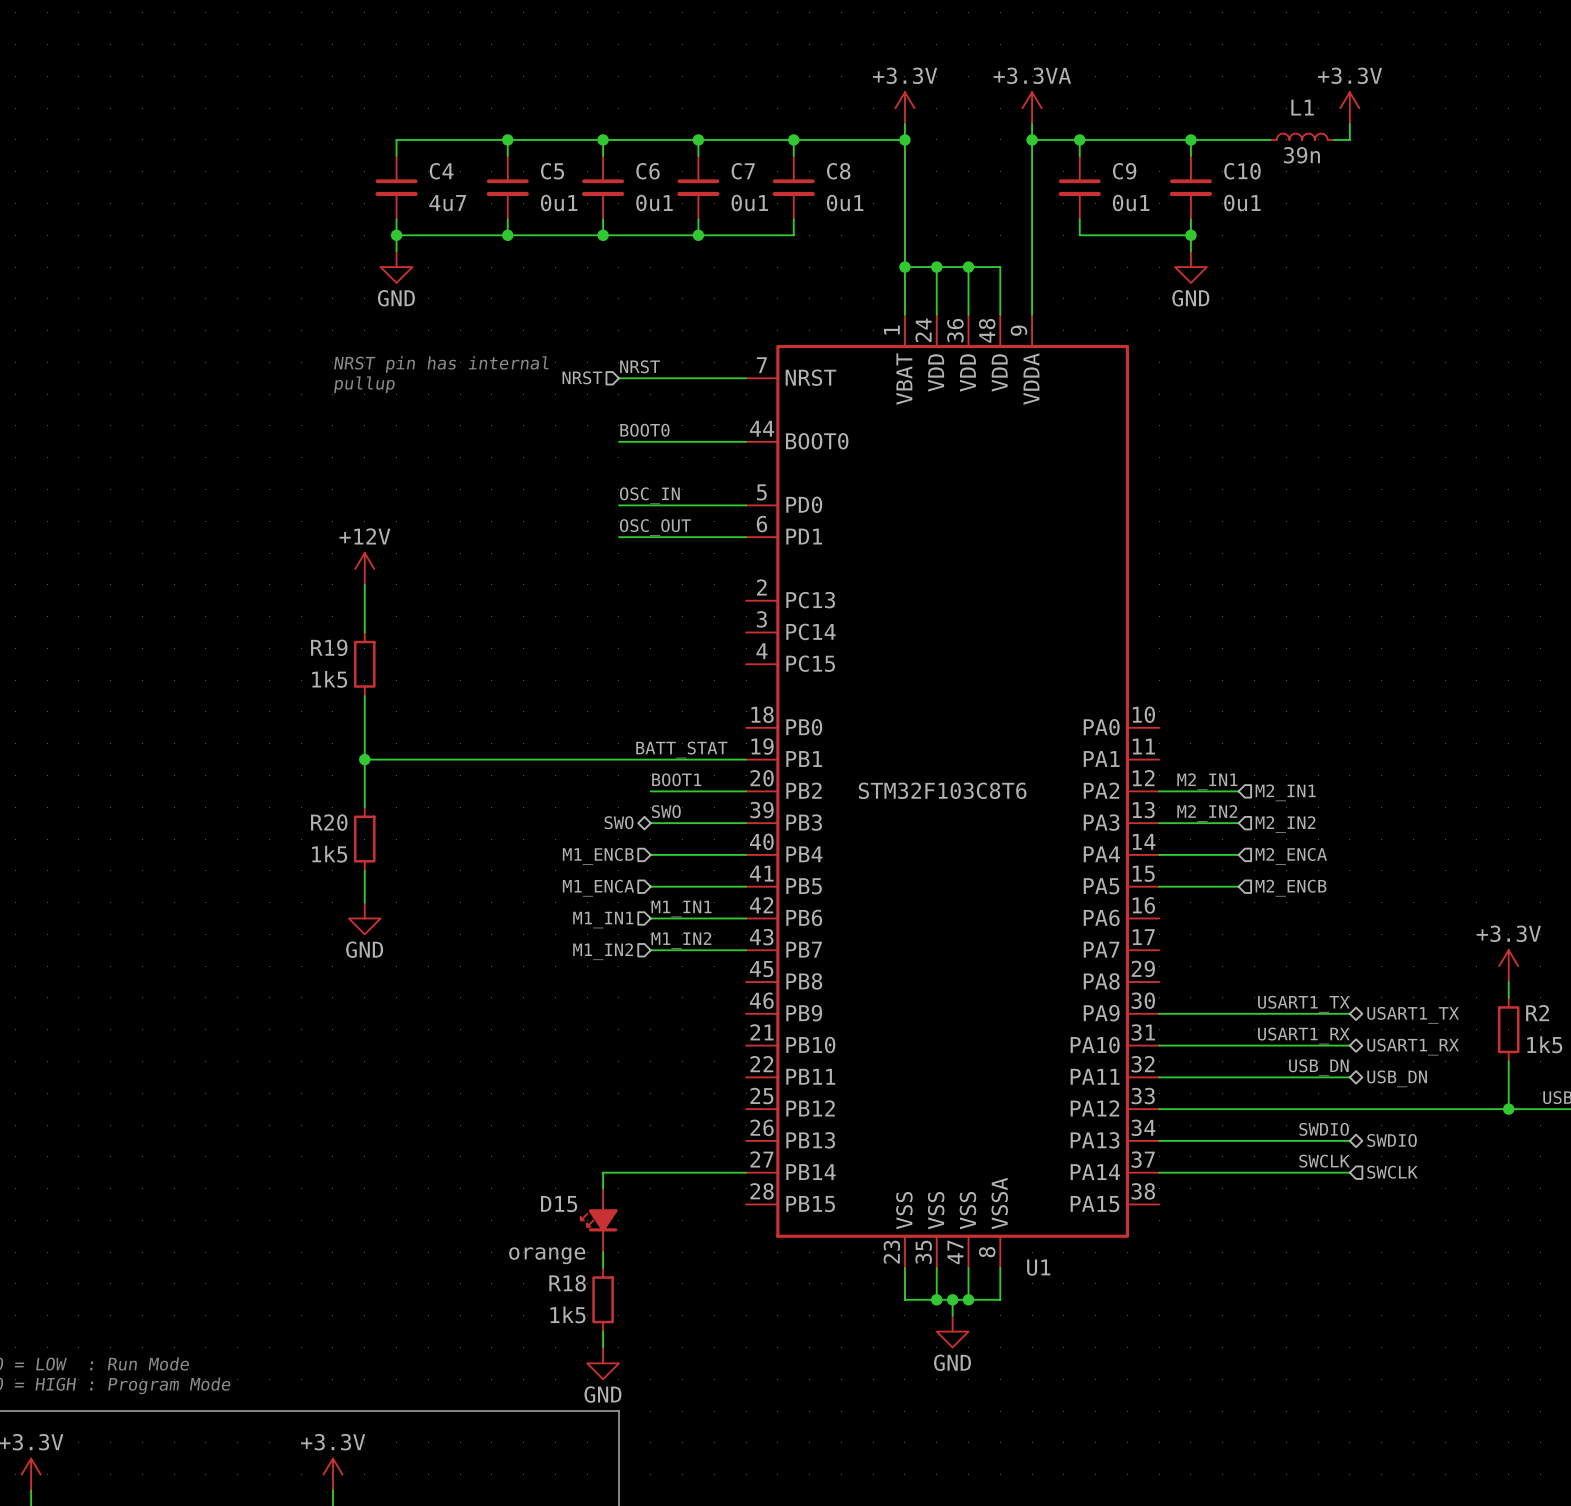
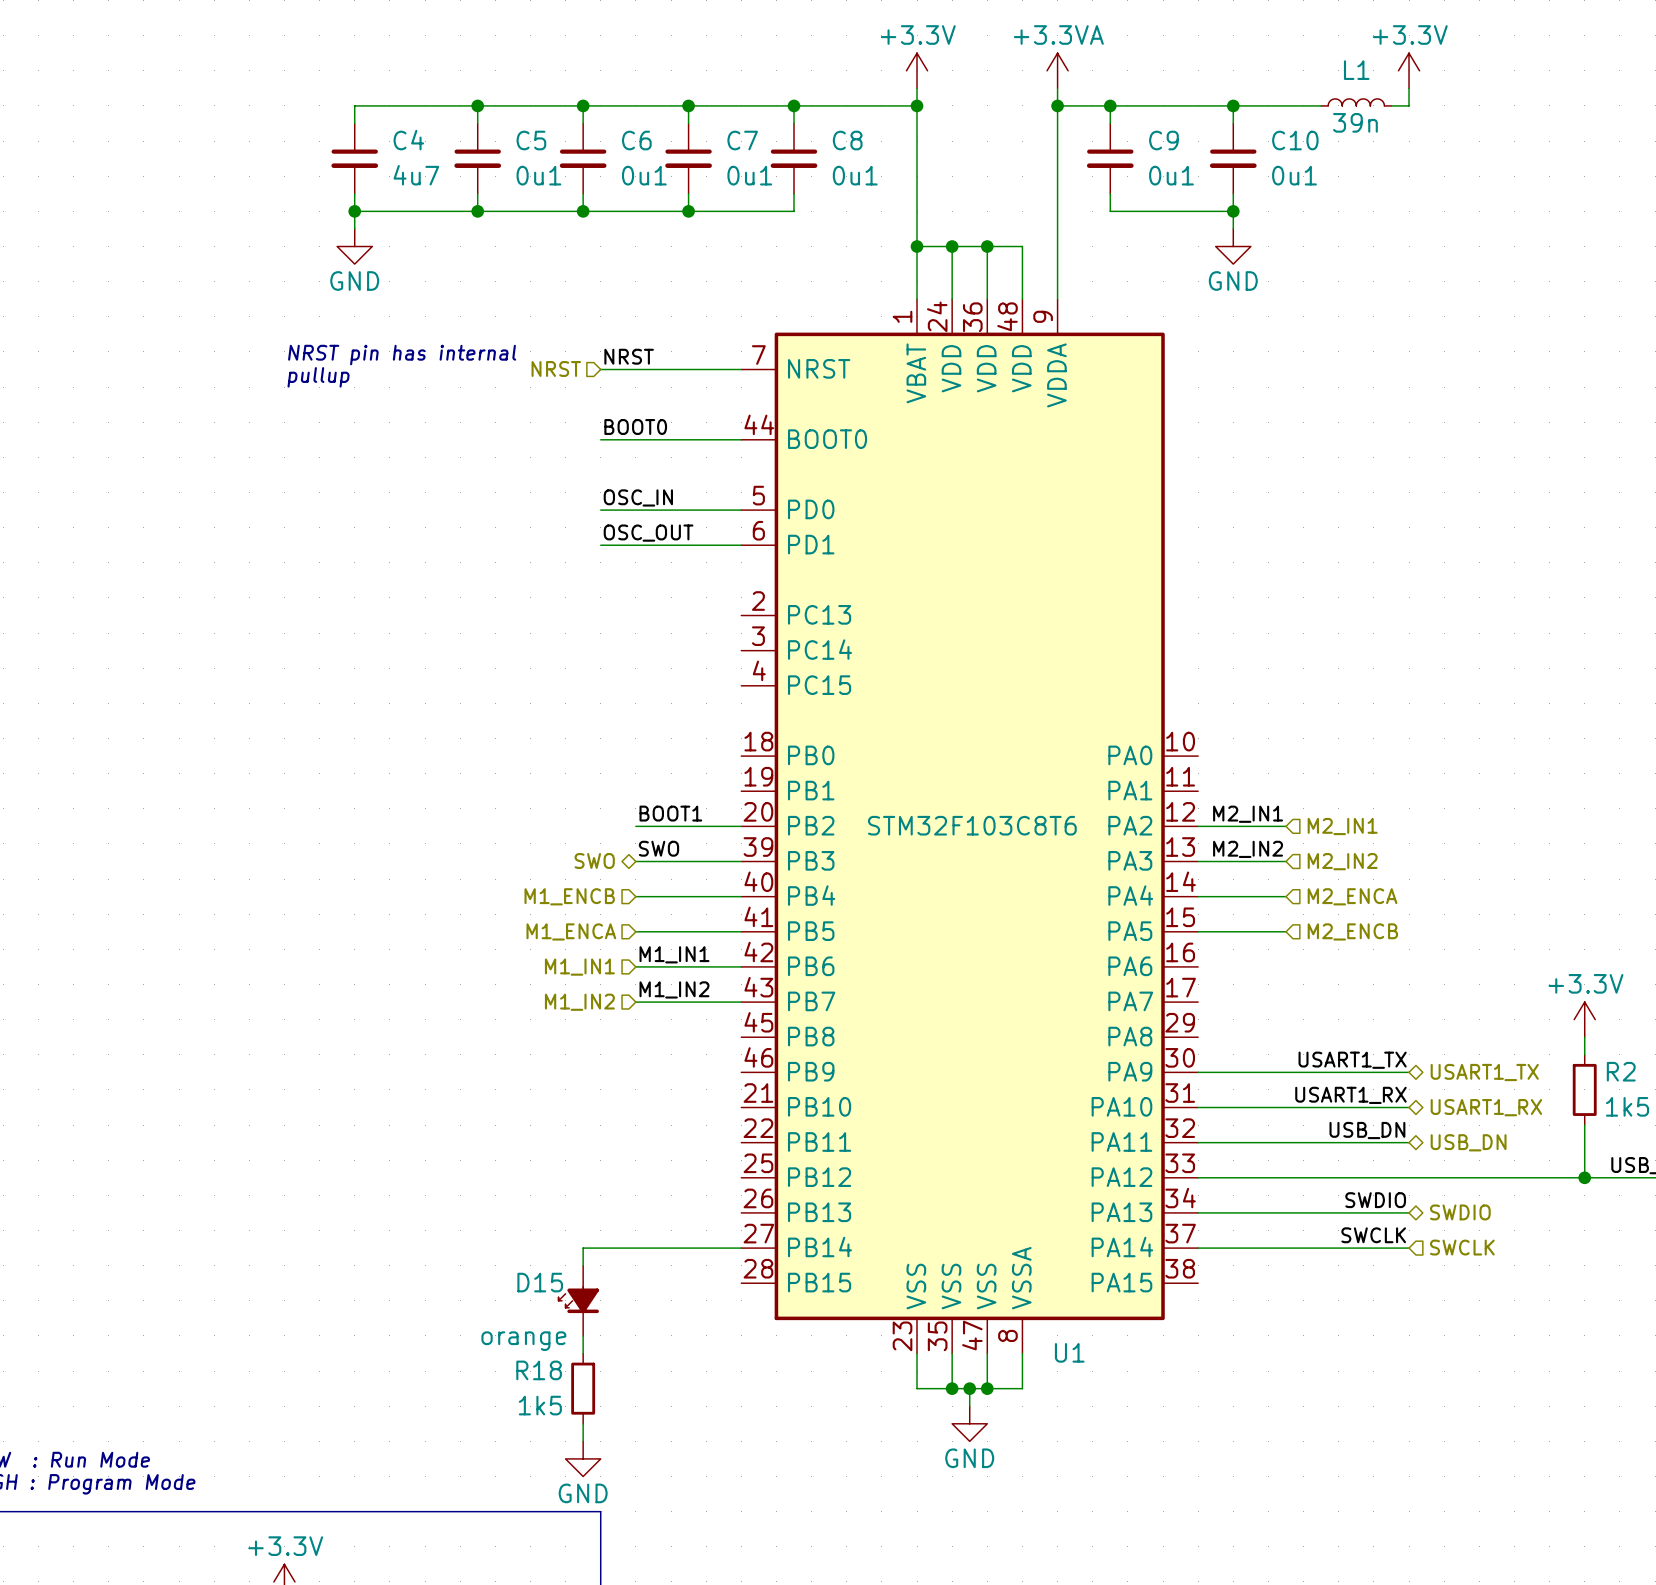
power symbol: +12V (364, 568) -> none
wire: (364, 584) (364, 632) -> none
R19: 1k5 (364, 664) -> none
wire: (364, 696) (364, 807) -> none
label: BATT_STAT (681, 749) -> none
wire: (364, 759) (746, 759) -> none
junction: (364, 759) -> none
R20: 1k5 (364, 839) -> none
wire: (364, 870) (364, 902) -> none
power symbol: GND (364, 918) -> none

